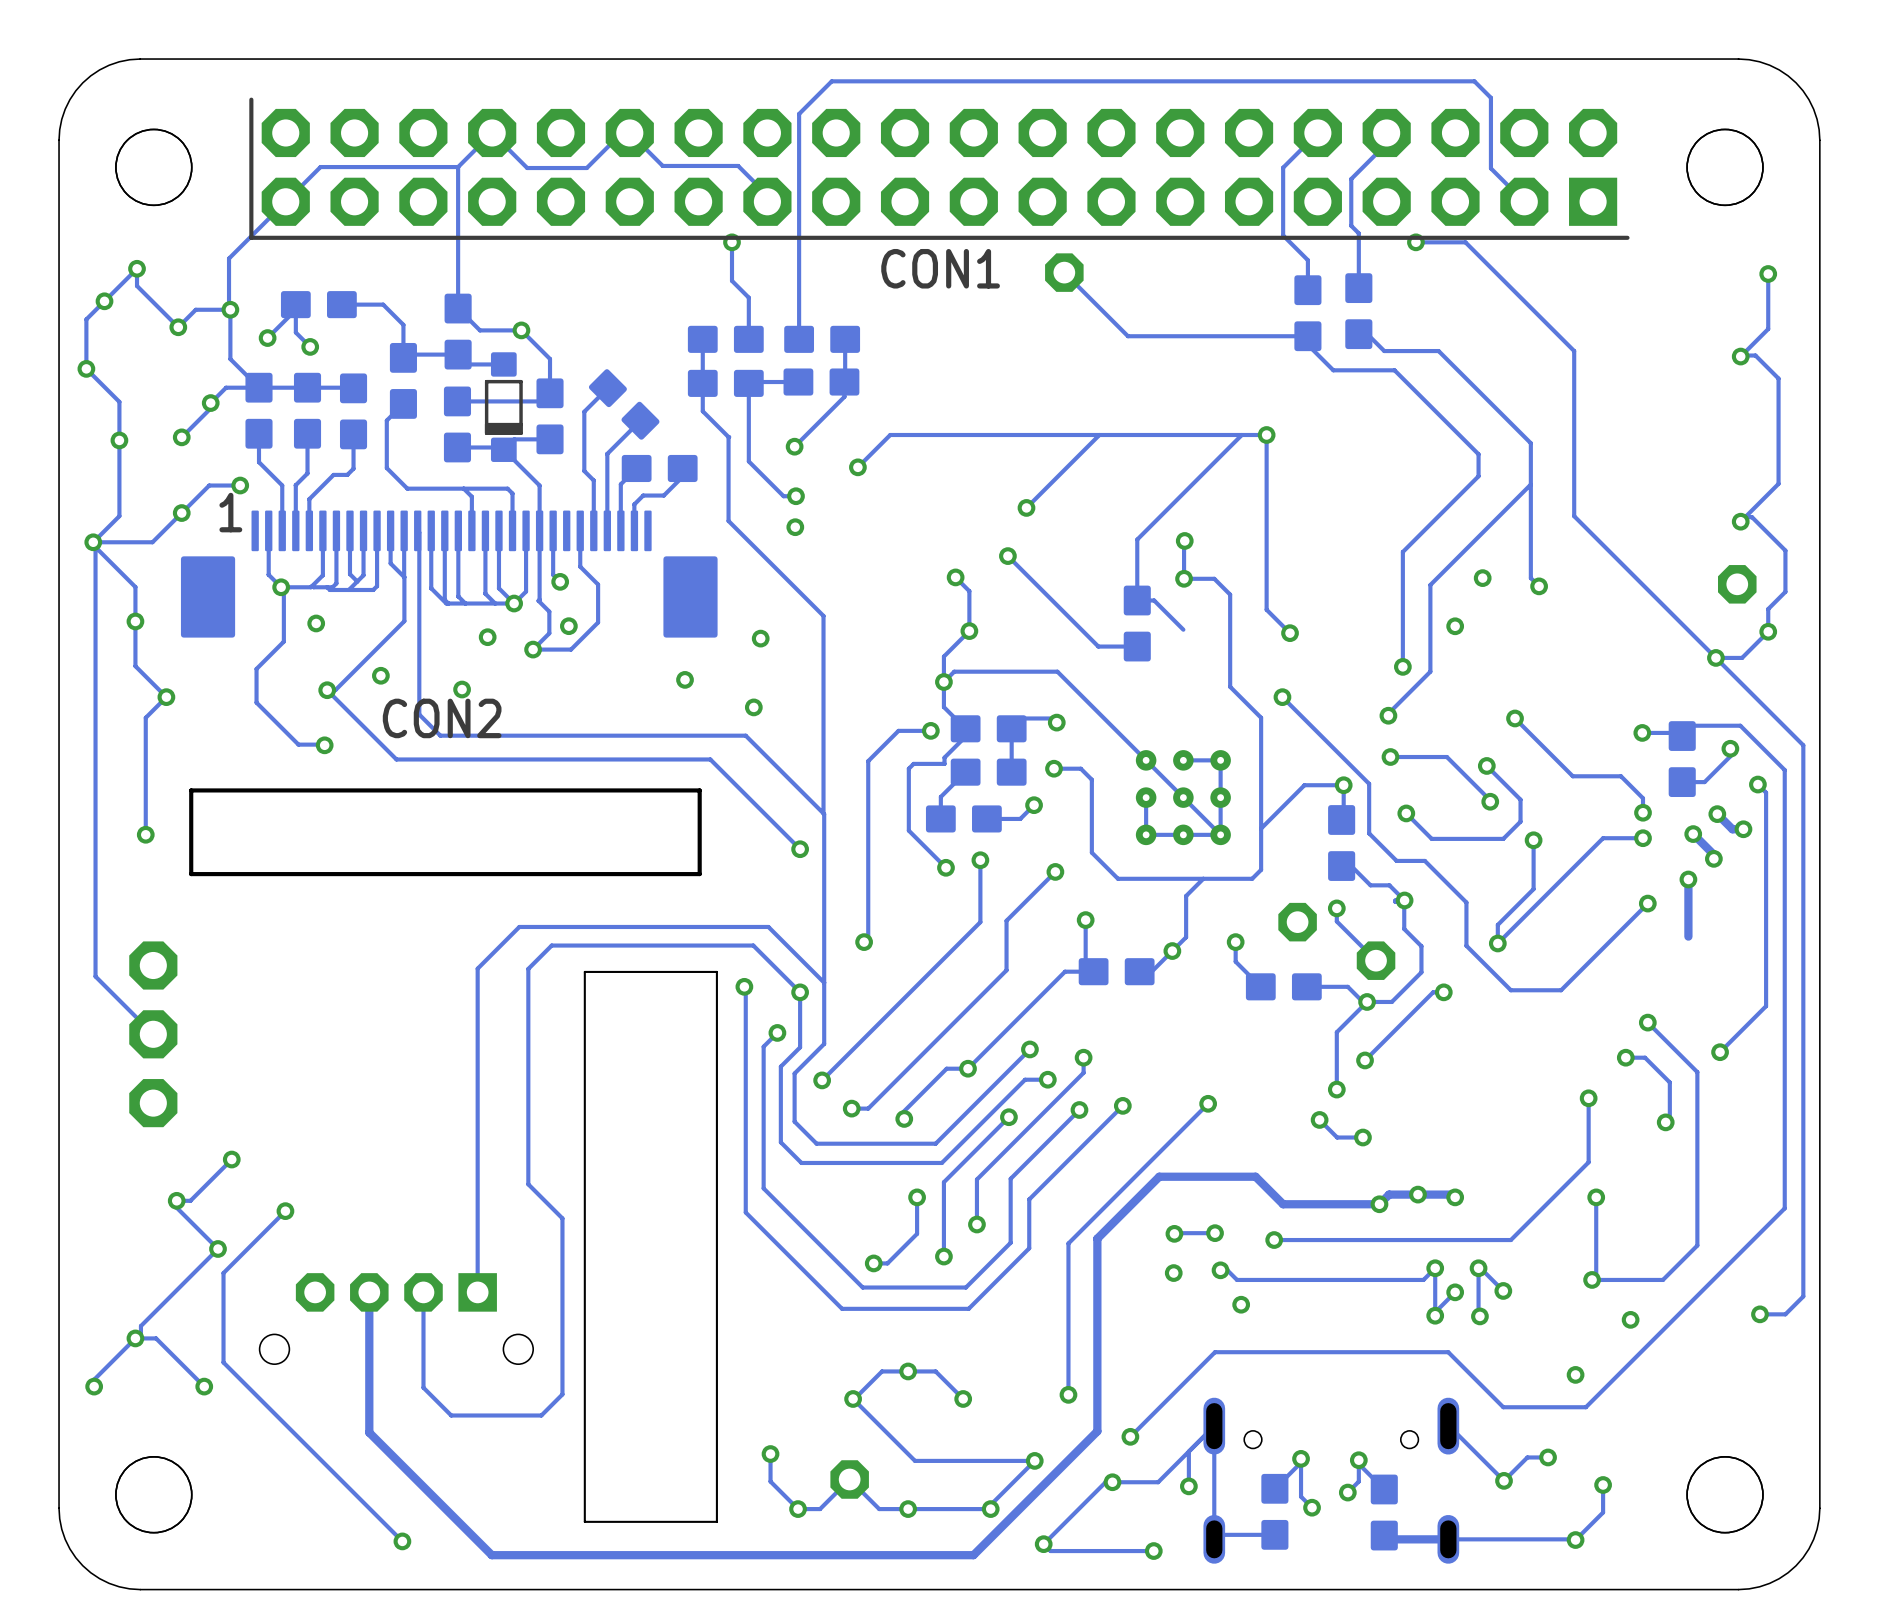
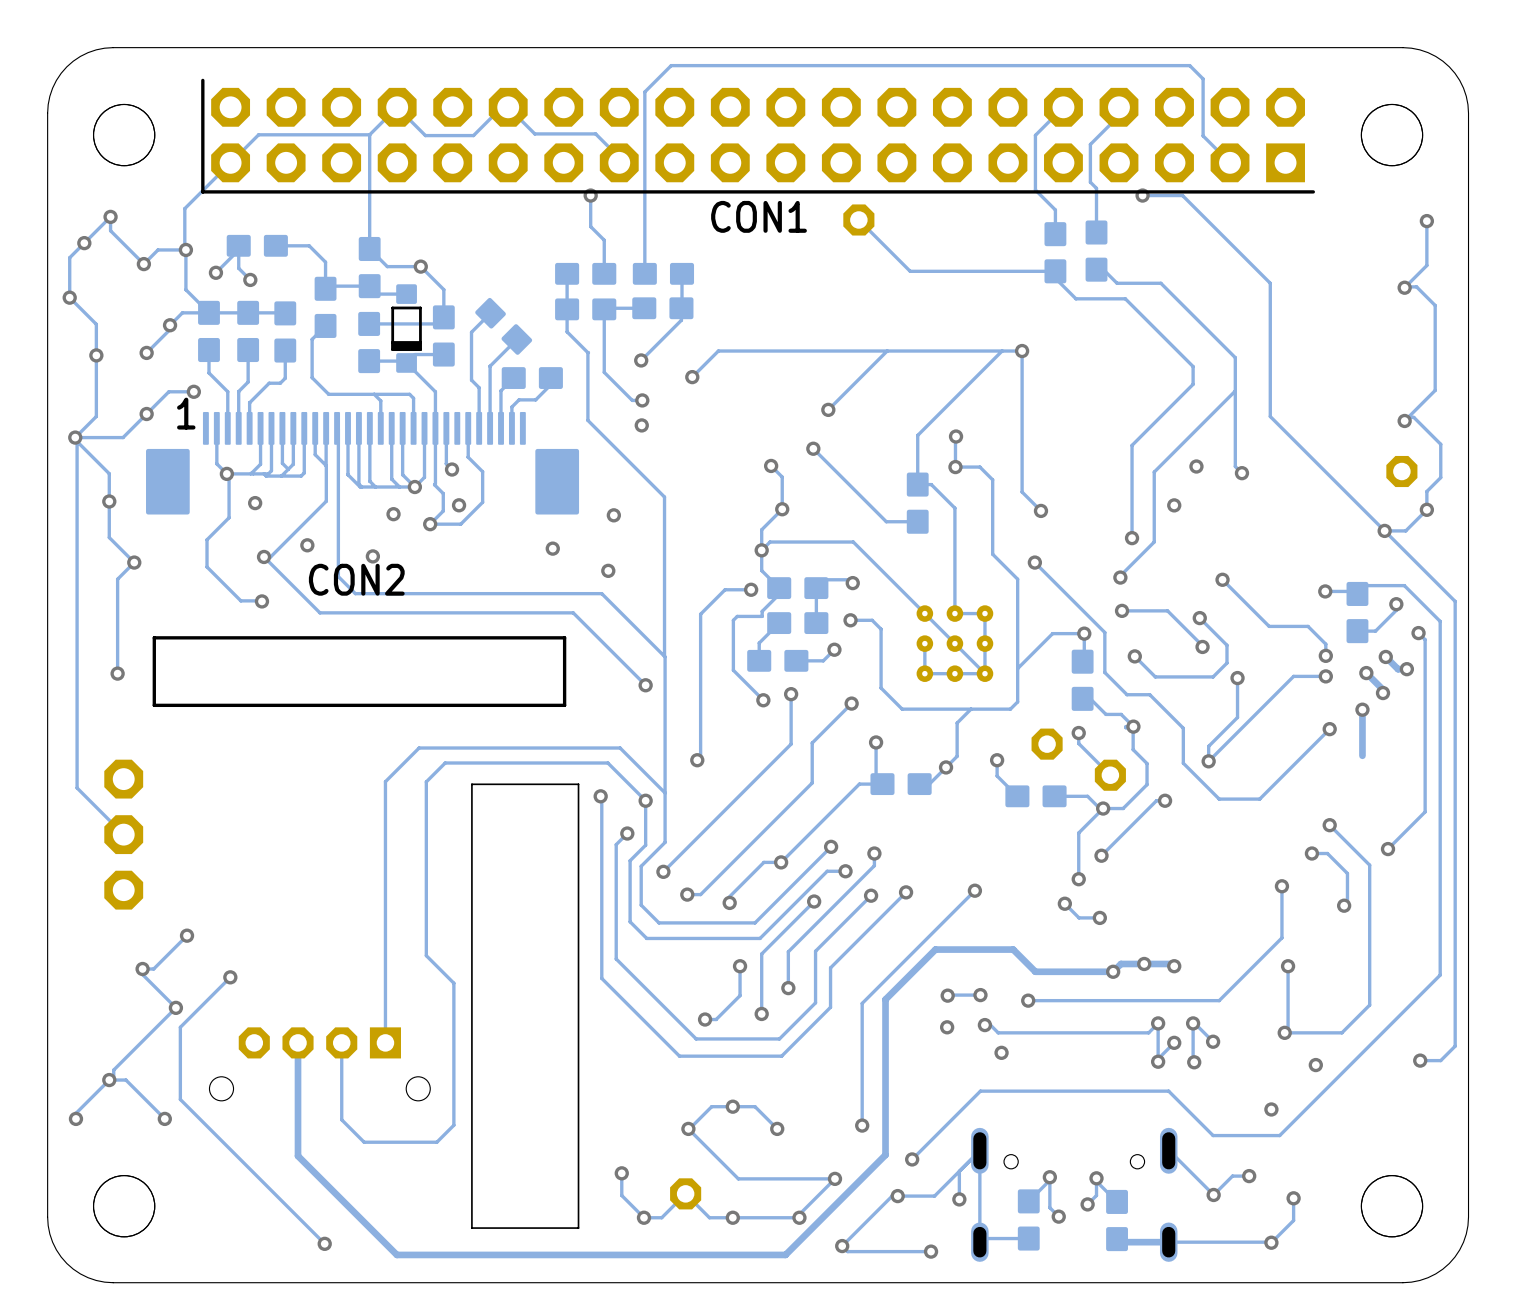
track: none -> (954, 508) (954, 613)

